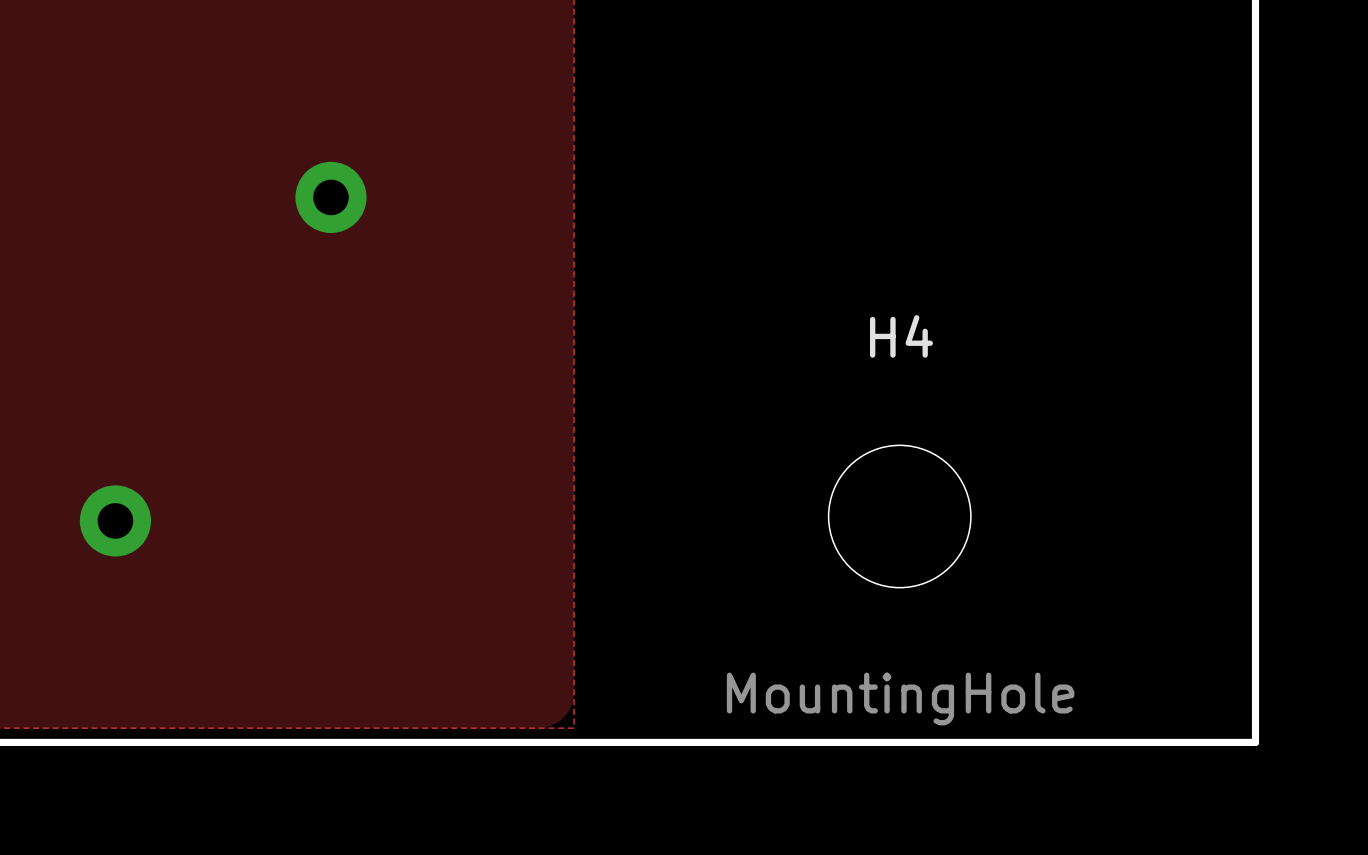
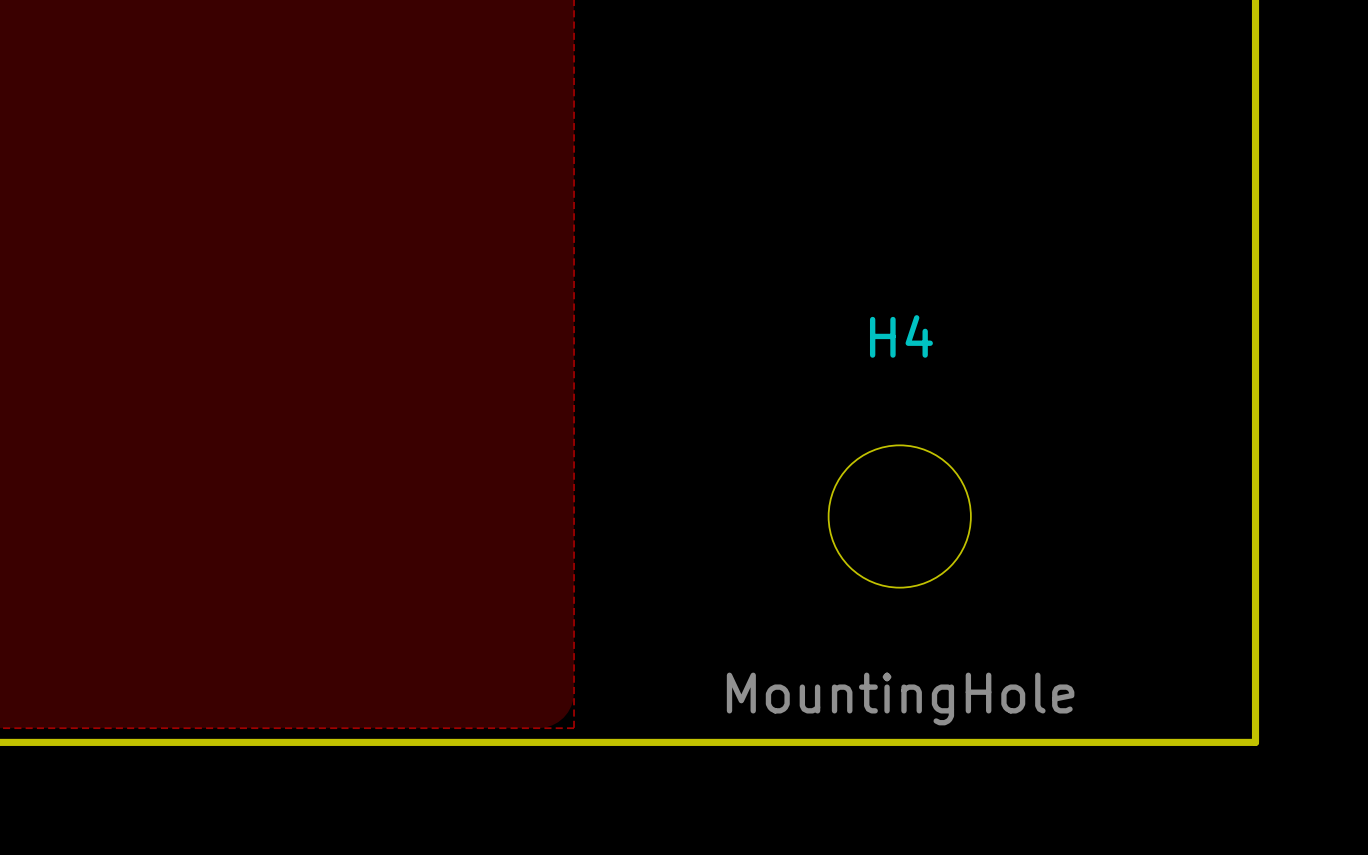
via: (331, 197) -> none
via: (115, 520) -> none

